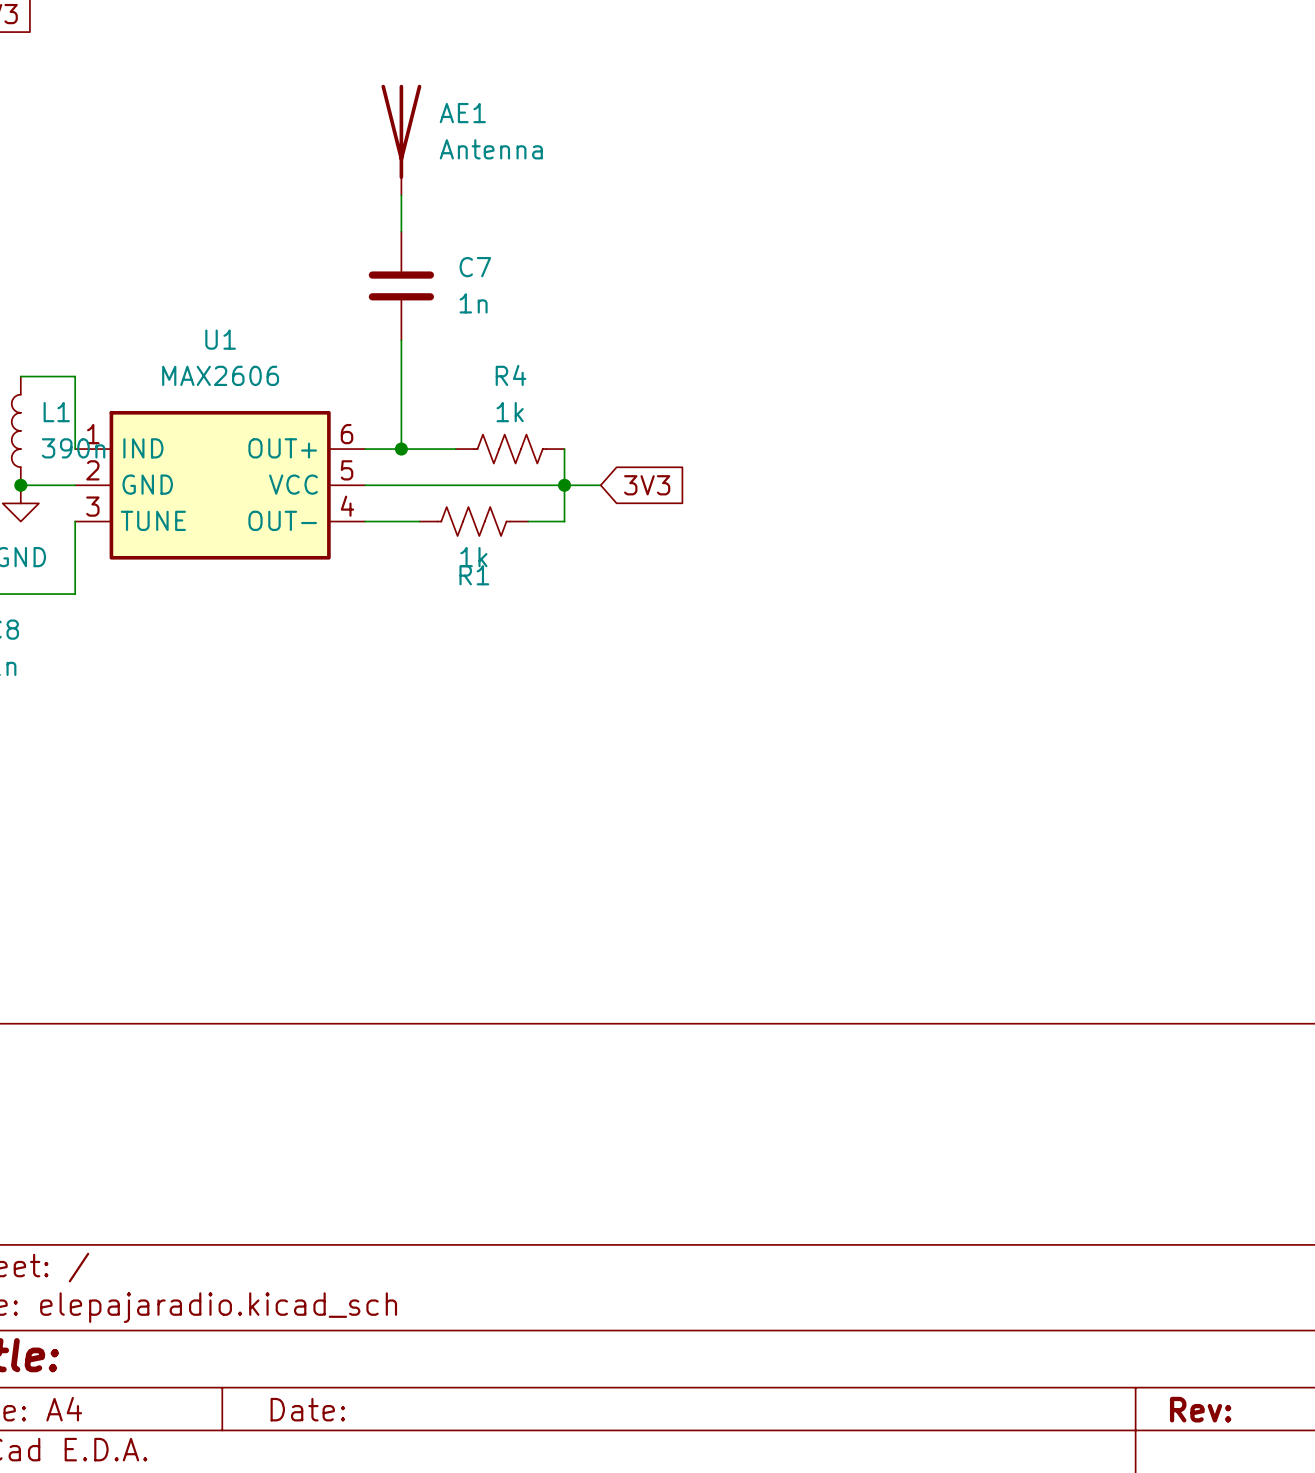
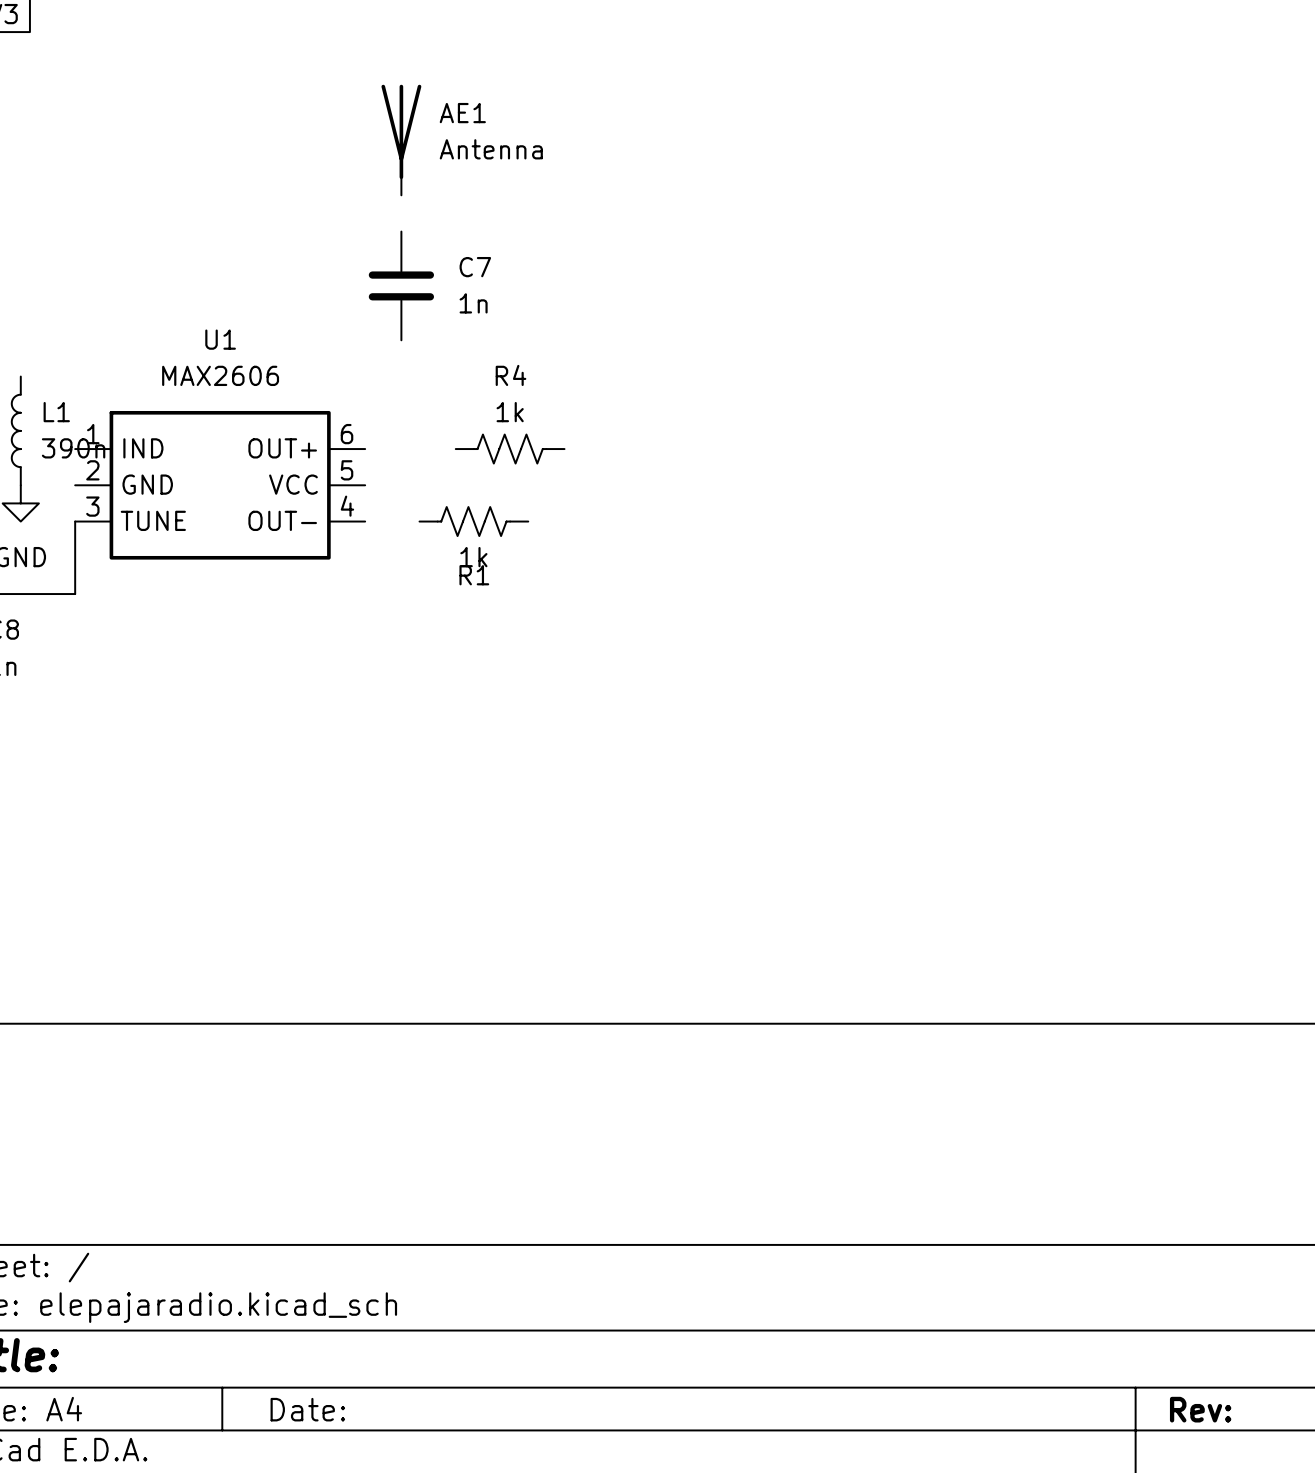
wire: (401, 195) (401, 231) -> none
wire: (401, 340) (401, 449) -> none
wire: (20, 376) (75, 376) (75, 449) -> none
wire: (365, 449) (455, 449) -> none
junction: (401, 449) -> none
wire: (564, 449) (564, 521) (528, 521) -> none
wire: (20, 485) (75, 485) -> none
junction: (20, 485) -> none
wire: (365, 485) (600, 485) -> none
junction: (564, 485) -> none
global label: 3V3 (647, 485) -> none
wire: (365, 521) (419, 521) -> none

